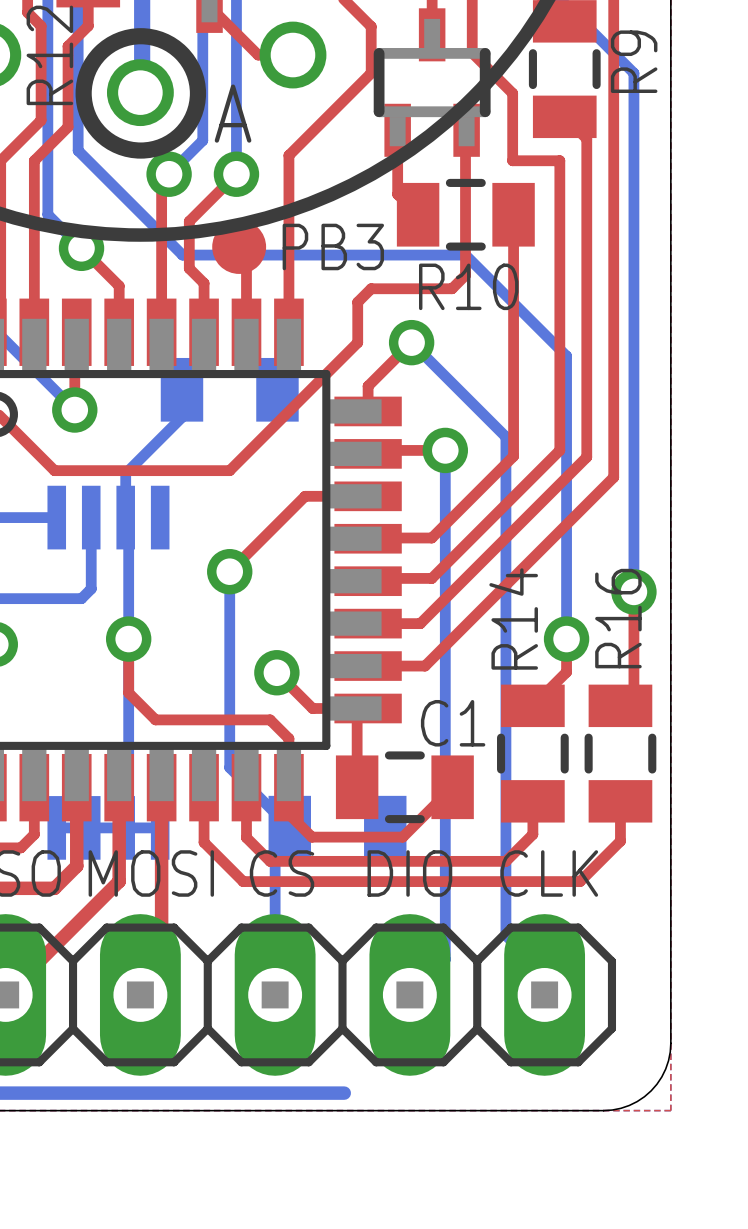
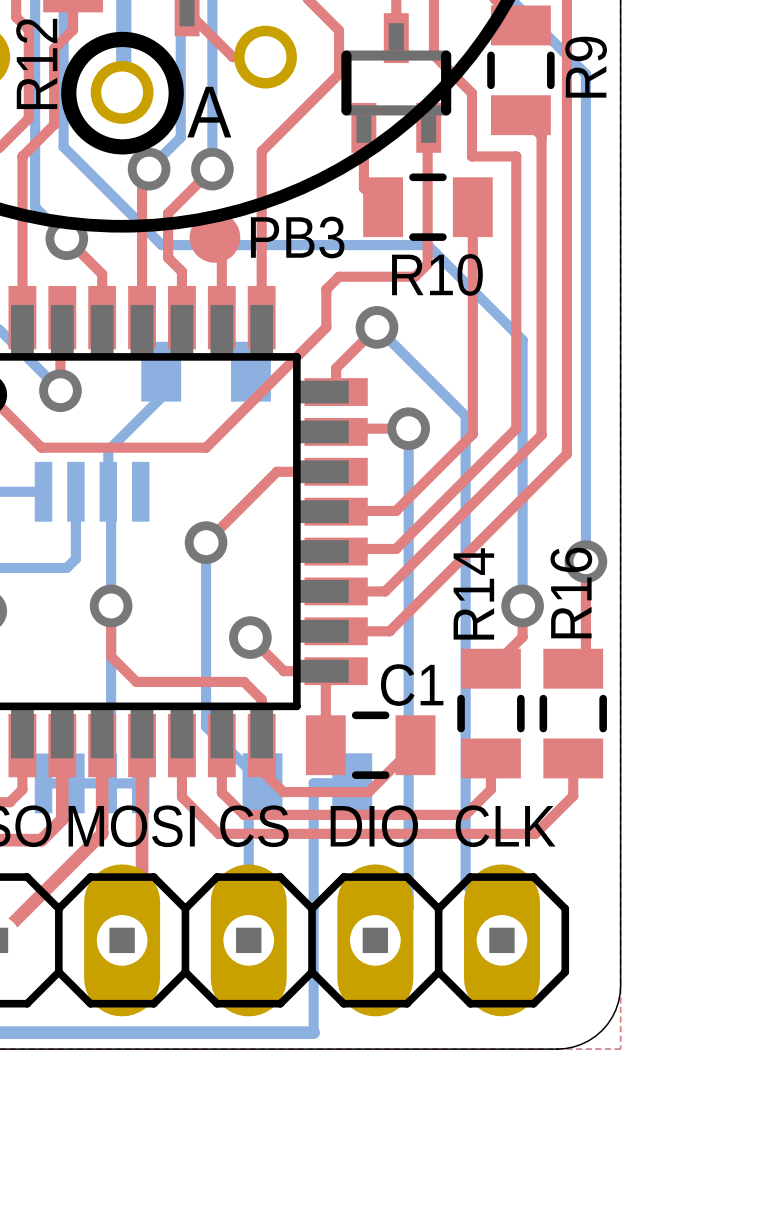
bottom track: none -> (352, 783) (313, 783) (313, 1032)

